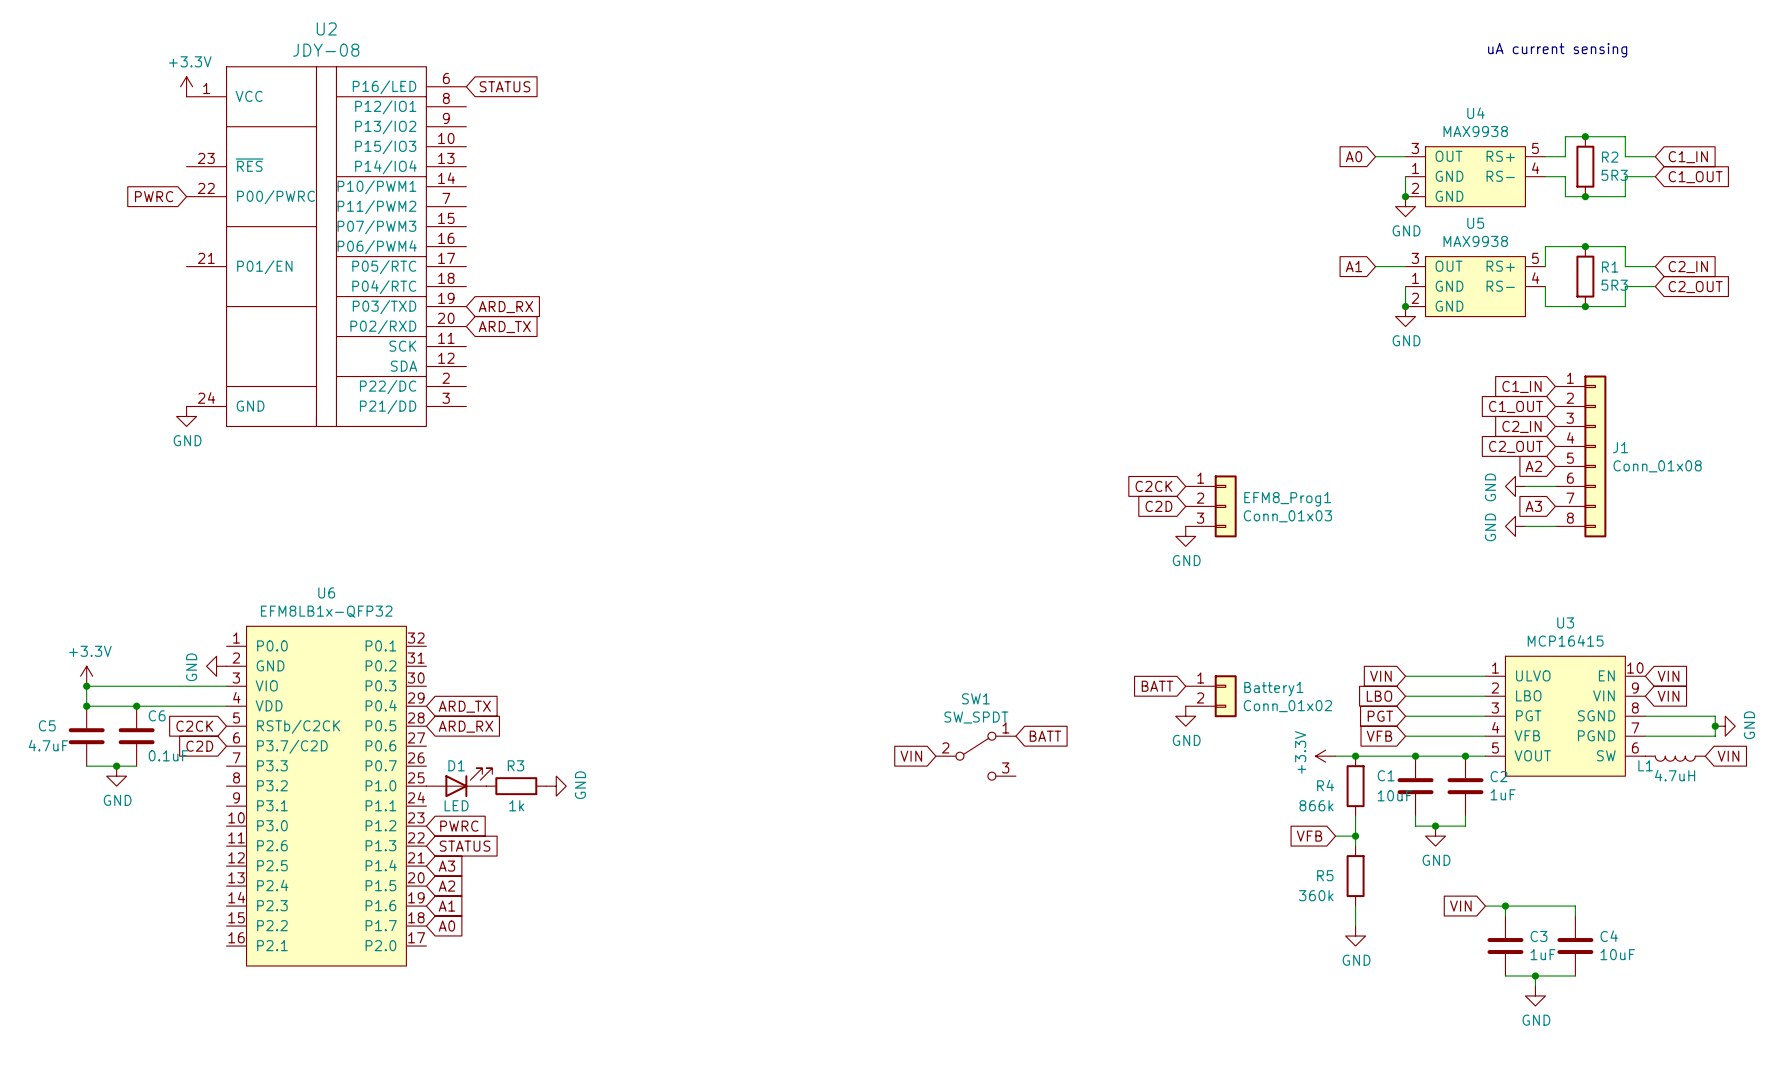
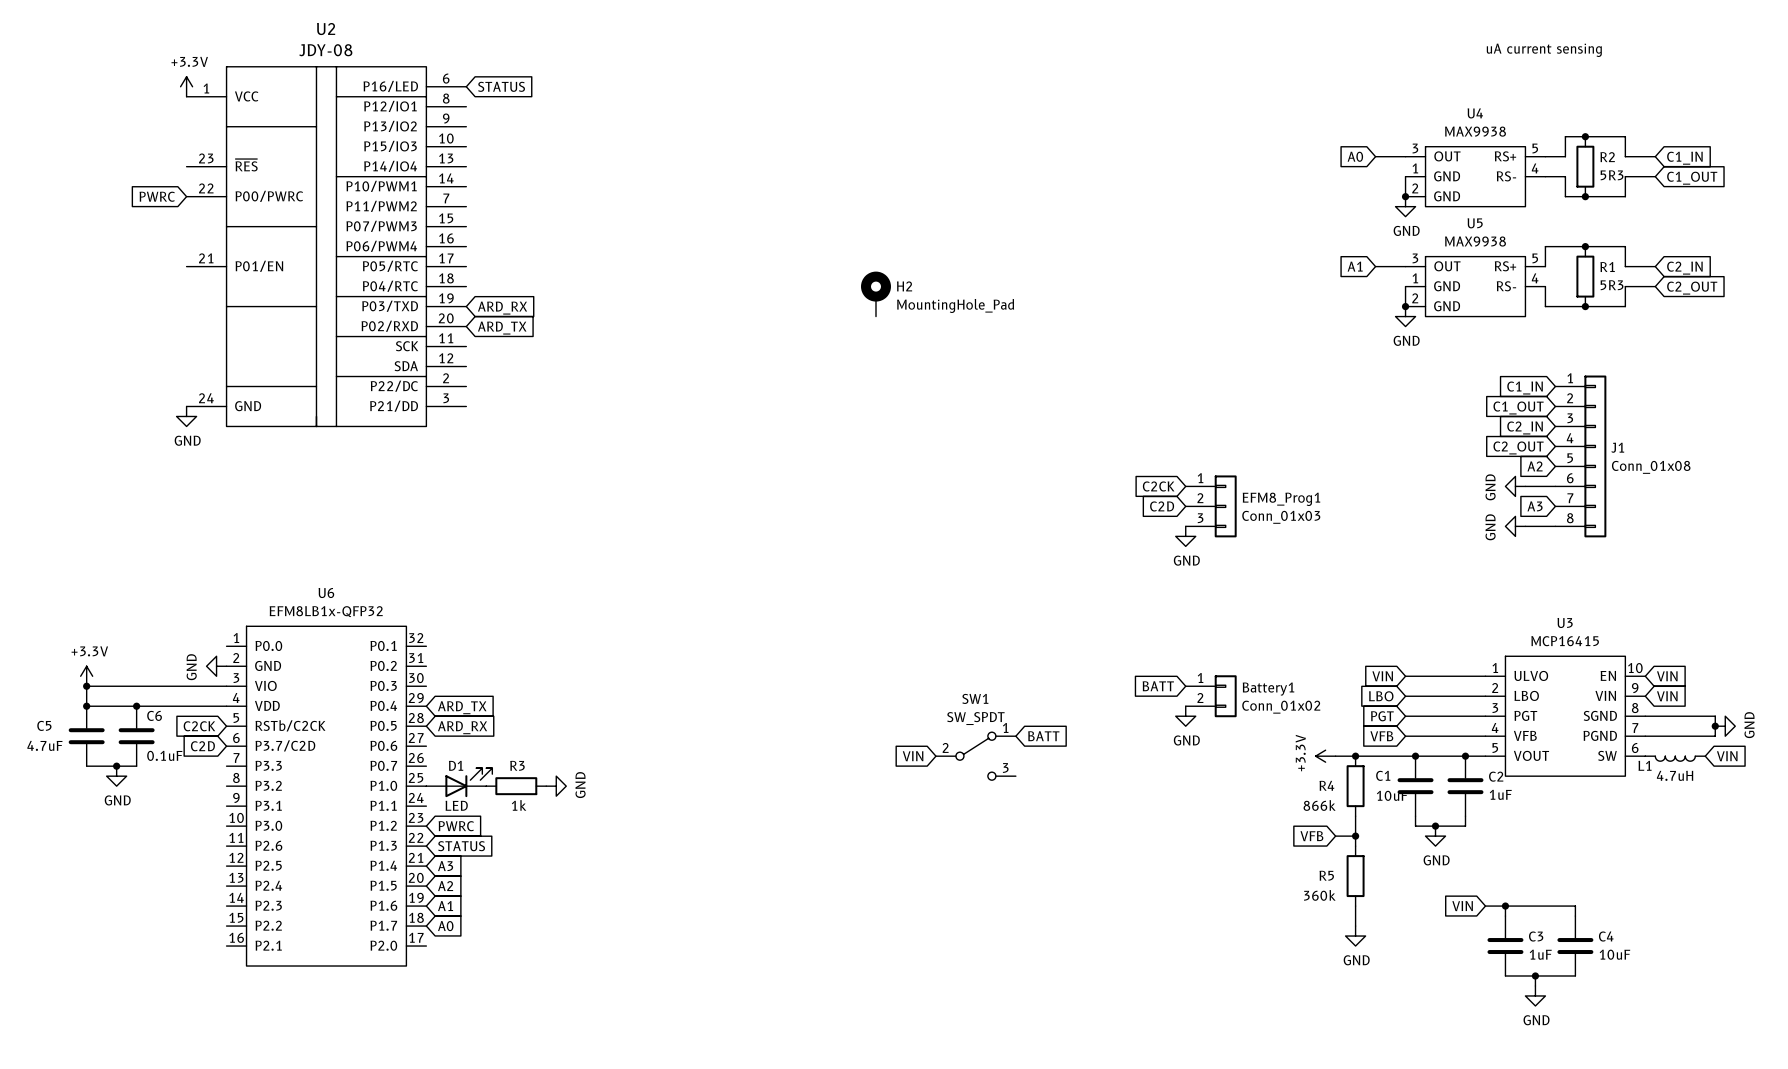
H2: none -> MountingHole_Pad (875, 294)

